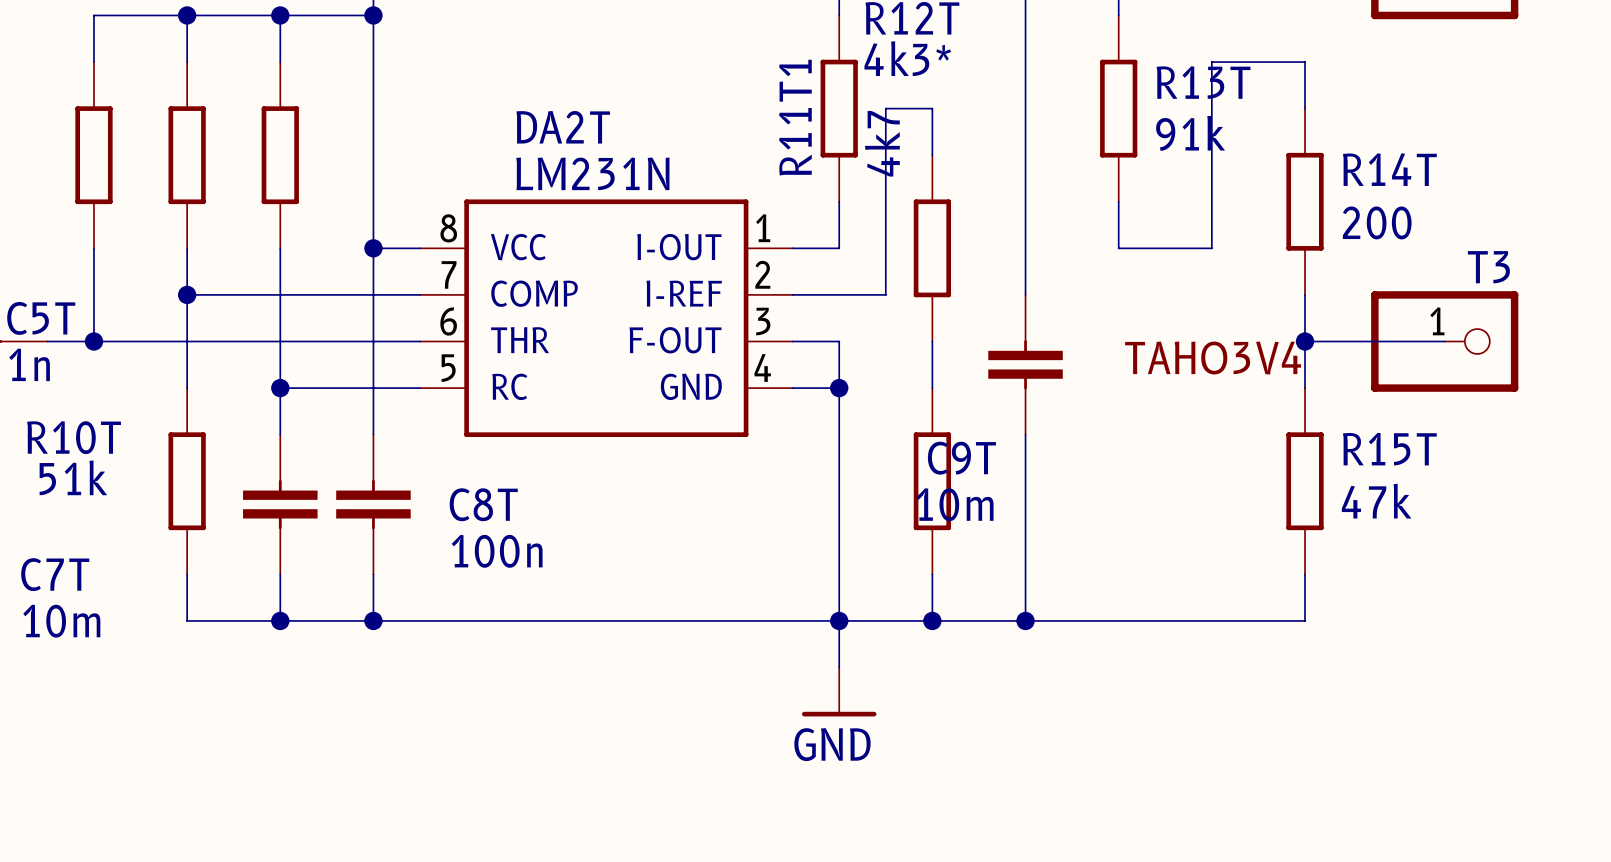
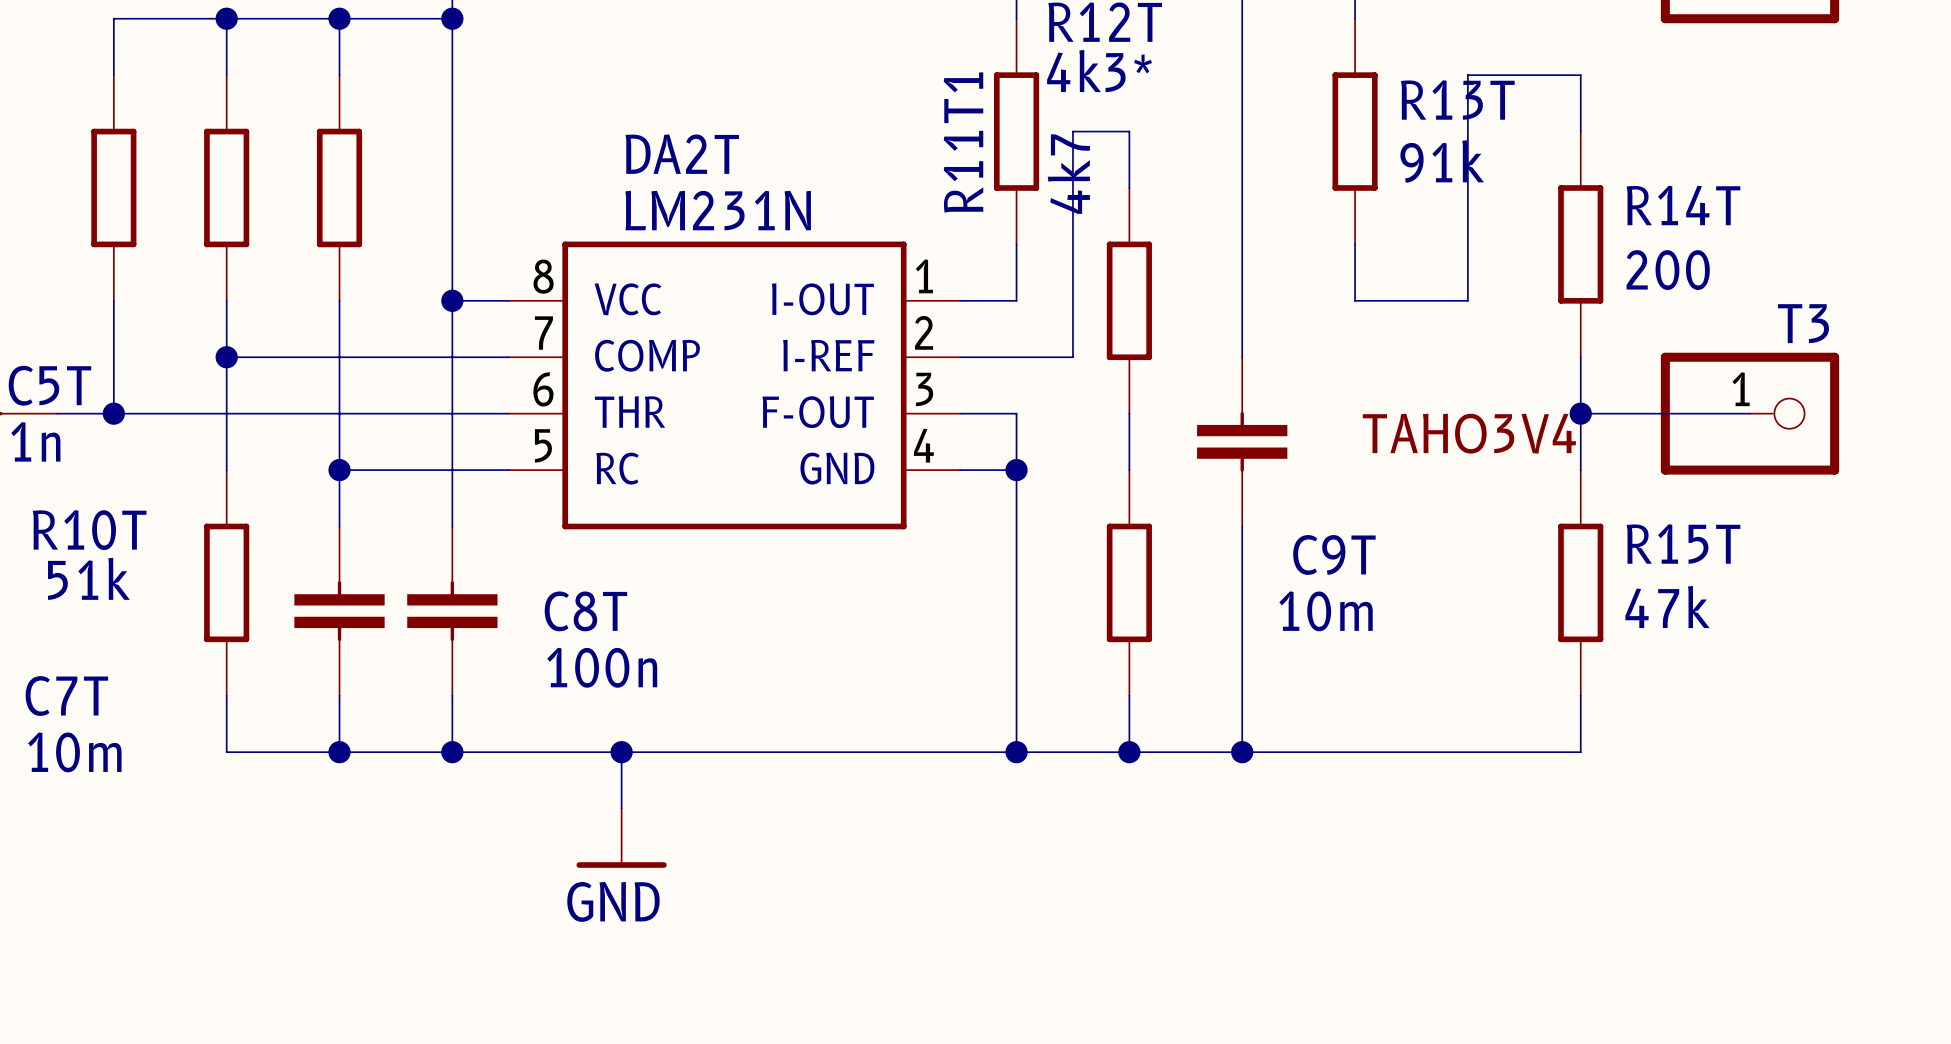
C9T name position: C9T (961, 458) -> C9T (1334, 554)
C9T value position: 10m (954, 504) -> 10m (1326, 611)
junction: none -> (621, 752)
wire: (839, 620) (839, 667) -> (621, 752) (621, 808)
power symbol position: GND (839, 692) -> GND (621, 838)

